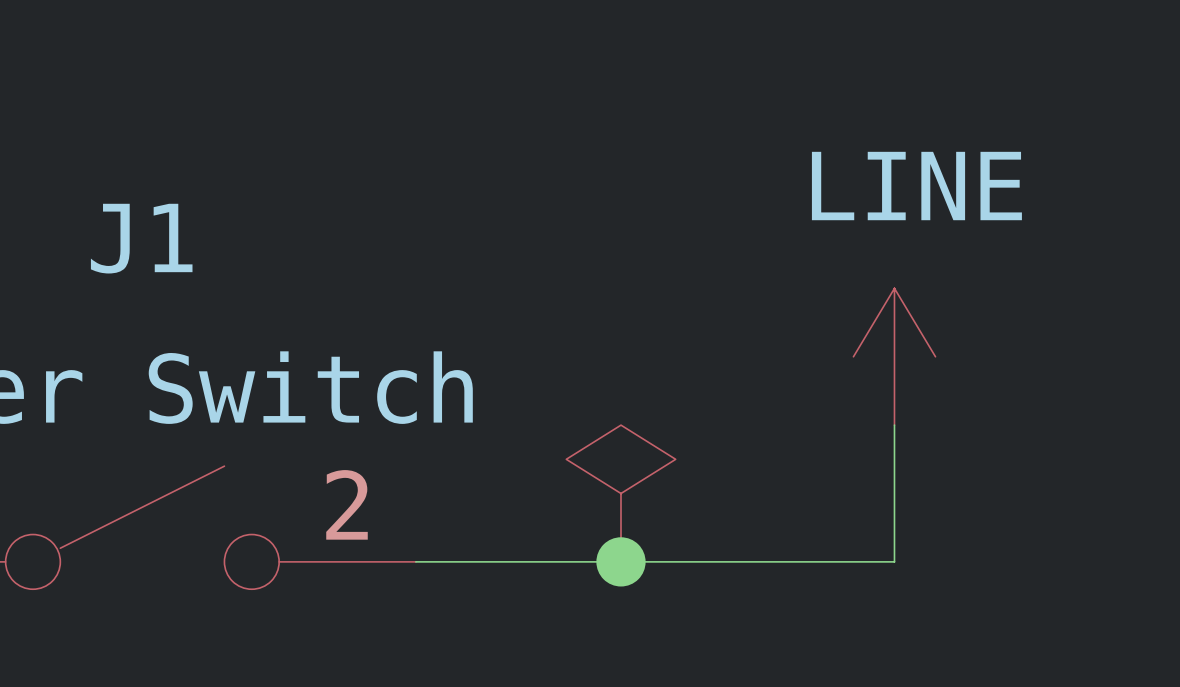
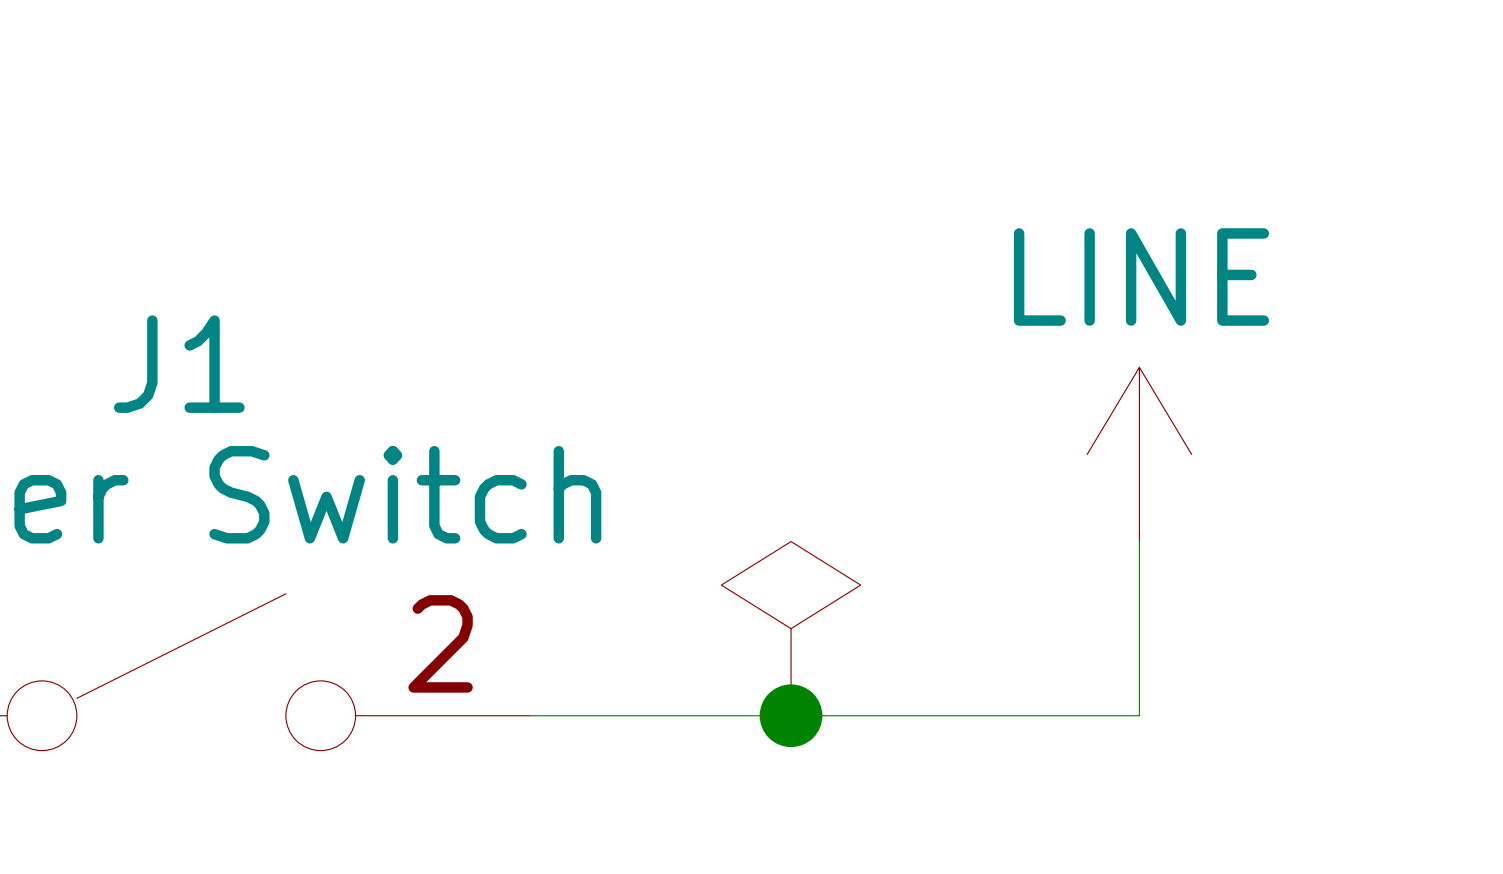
power symbol text position: LINE (916, 186) -> LINE (1141, 277)
J1 name position: J1 (141, 238) -> J1 (179, 364)

